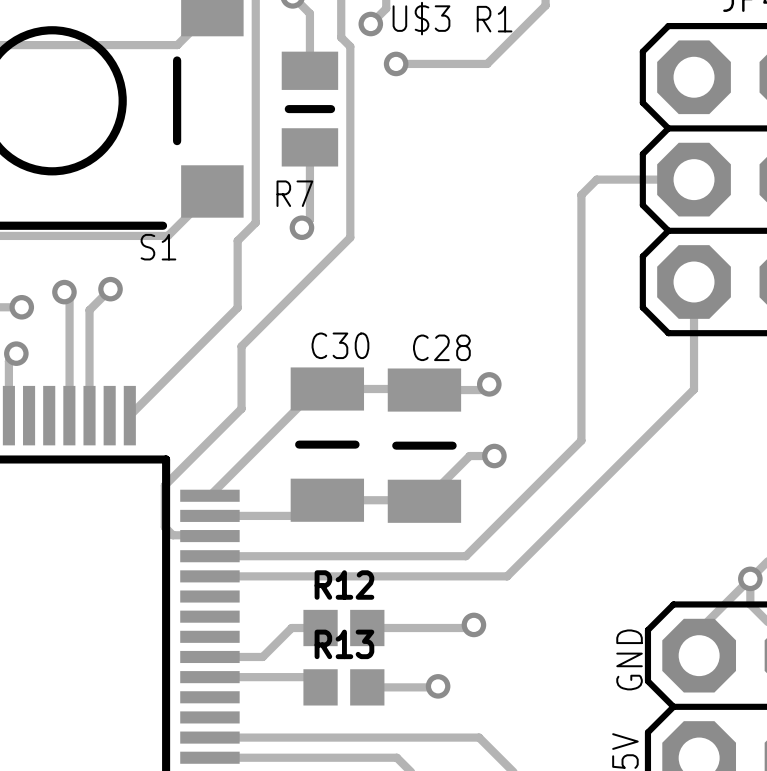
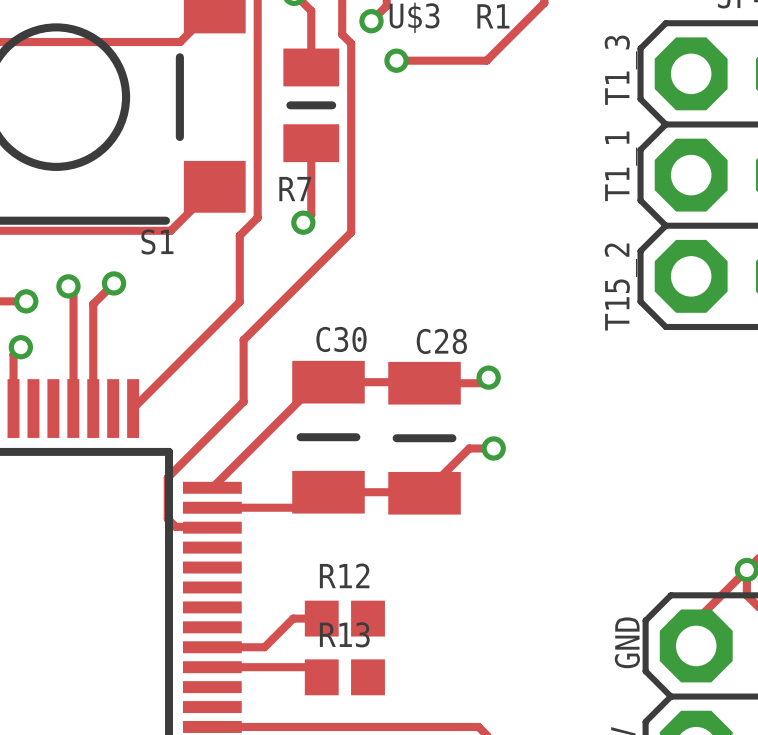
text: none -> T1_3 (620, 70)
text: none -> T1_1 (621, 166)
track: (694, 179) (596, 179) (581, 194) (581, 440) (465, 556) (209, 556) -> none
track: (694, 281) (694, 389) (507, 576) (209, 576) -> none
text: none -> T15_2 (620, 287)
track: (473, 624) (470, 628) (367, 628) -> none
via: (473, 624) -> none
track: (438, 686) (367, 687) -> none
via: (438, 686) -> none

